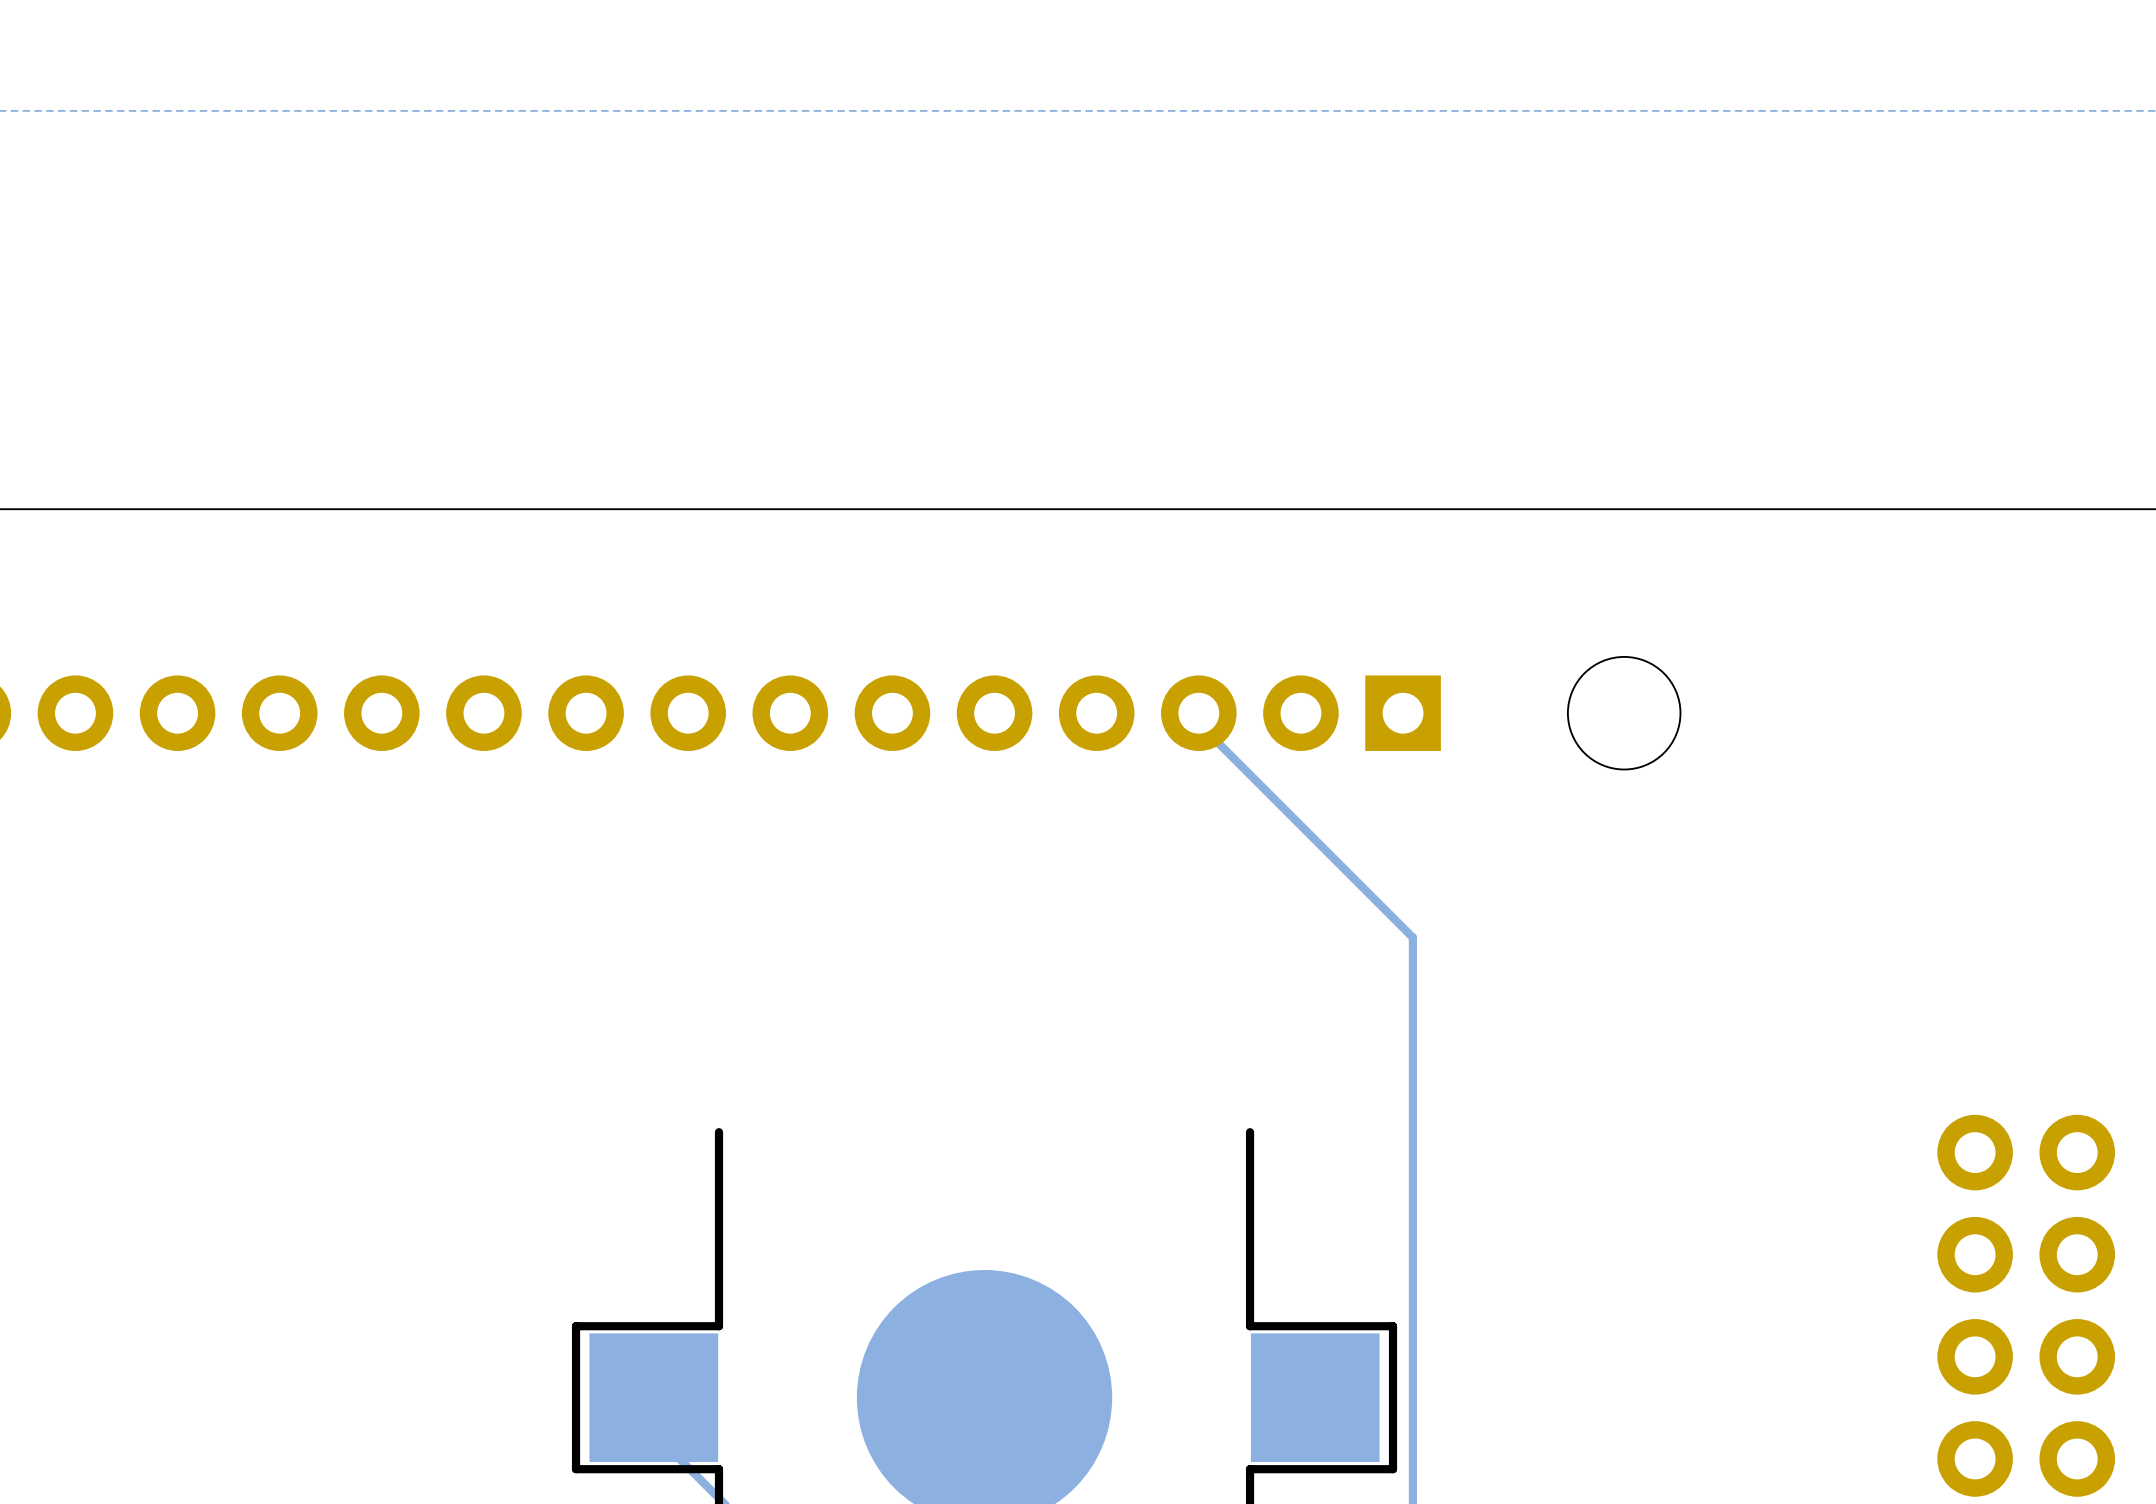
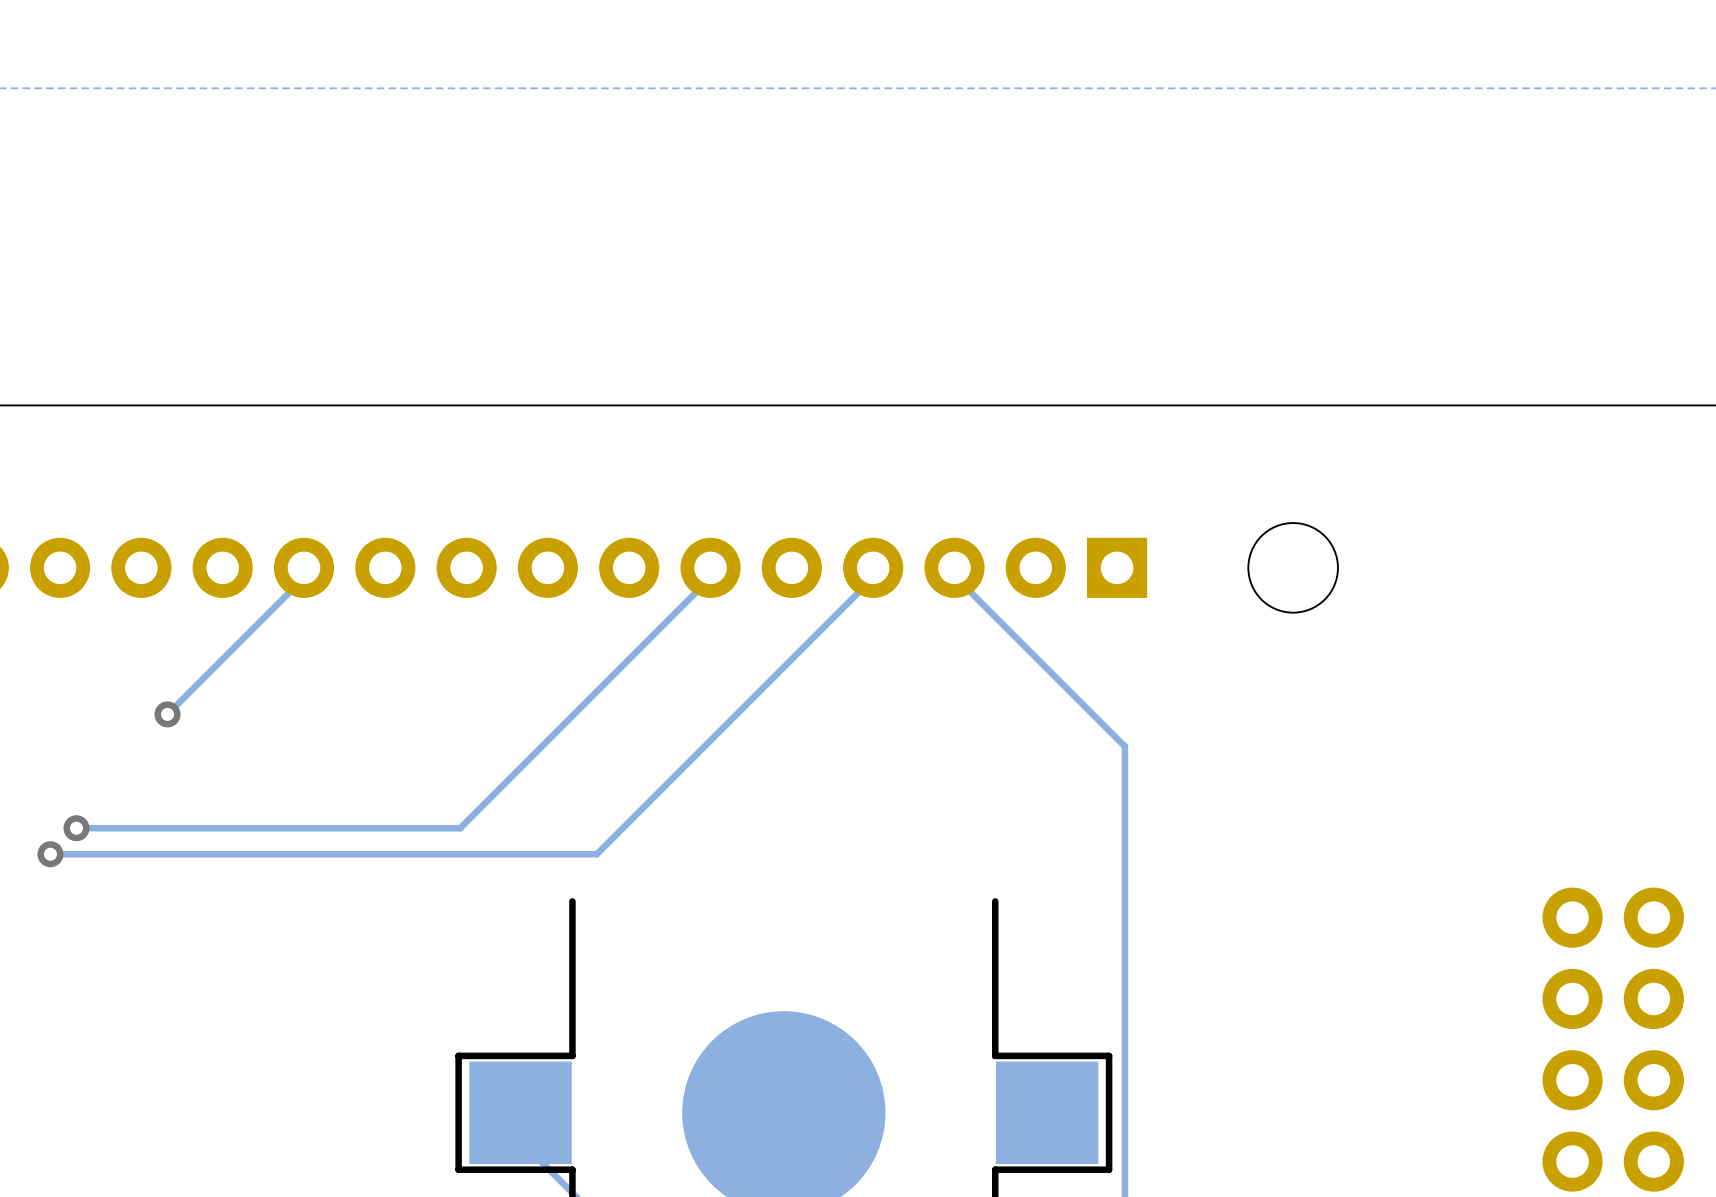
track: none -> (304, 567) (300, 568) (300, 581) (167, 714)
track: none -> (710, 567) (707, 568) (707, 581) (460, 828) (76, 828)
track: none -> (873, 567) (870, 568) (870, 581) (596, 854) (50, 854)
via: none -> (167, 714)
via: none -> (76, 828)
via: none -> (50, 854)

